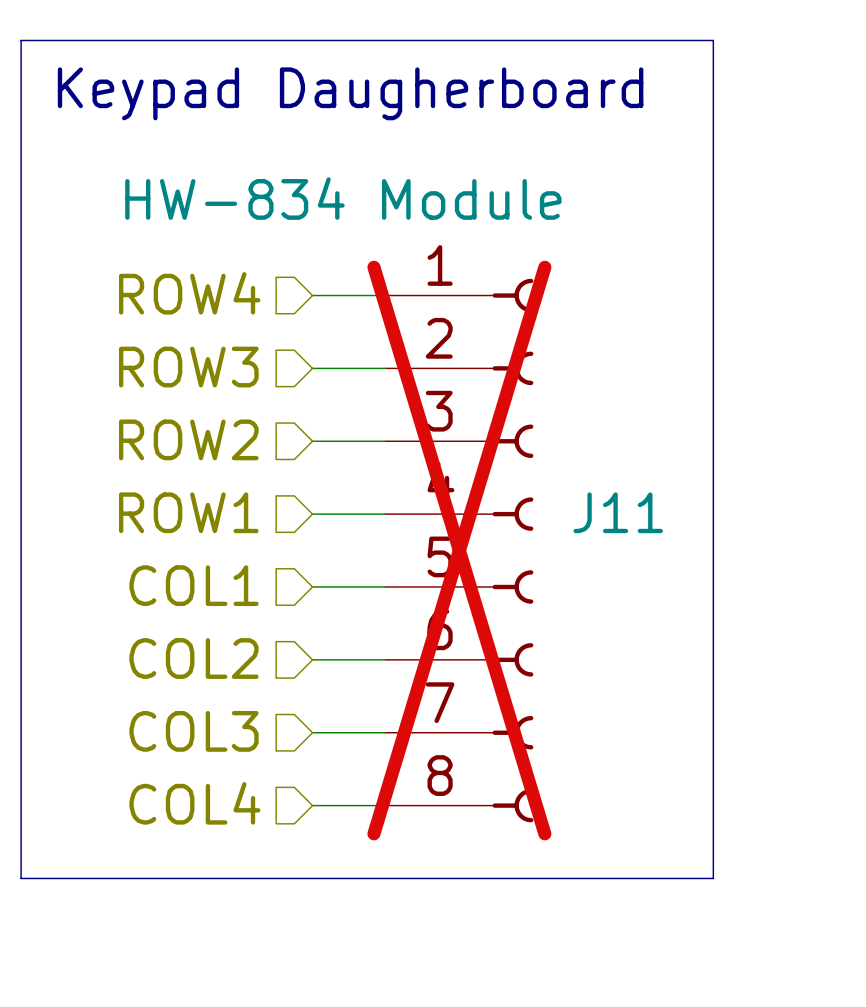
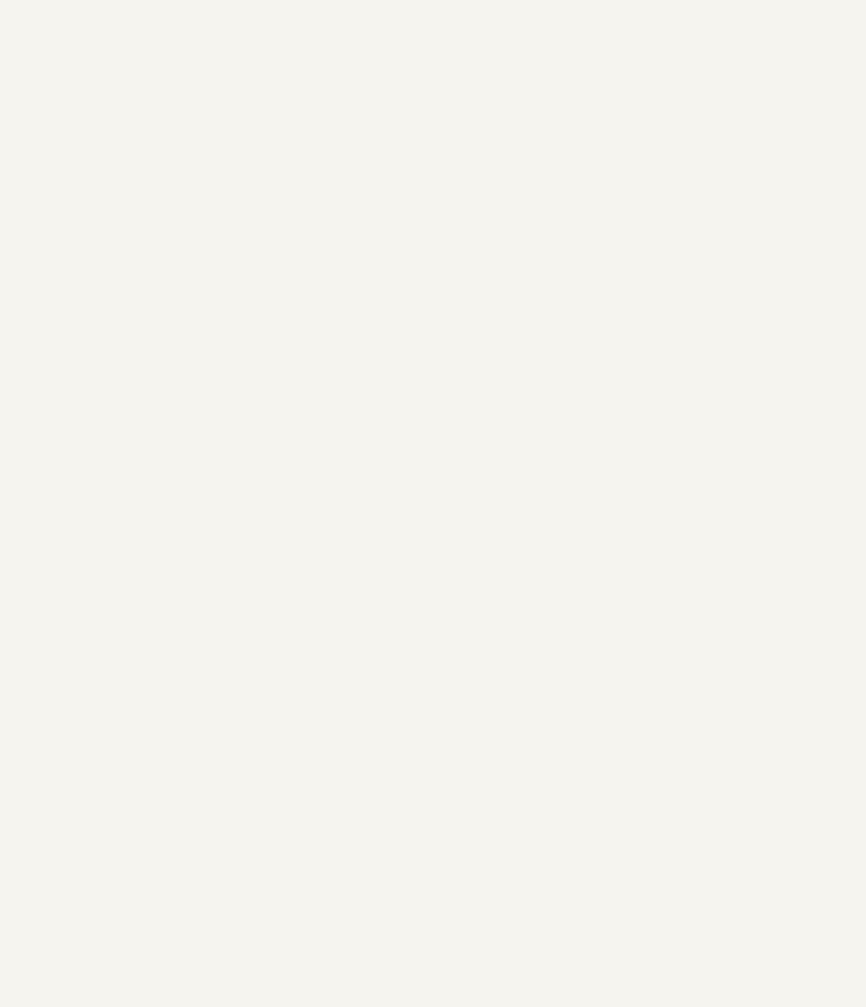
line: (21, 40) (713, 40) (713, 878) (21, 878) (21, 40) -> none
text: Keypad Daugherboard (350, 93) -> none
hierarchical label: ROW4 (189, 293) -> none
wire: (312, 295) (385, 295) -> none
hierarchical label: ROW3 (188, 367) -> none
wire: (312, 368) (385, 368) -> none
hierarchical label: ROW2 (188, 439) -> none
wire: (312, 441) (385, 441) -> none
hierarchical label: ROW1 (188, 512) -> none
wire: (312, 514) (385, 514) -> none
J11: HW-834 Module (459, 550) -> none
hierarchical label: COL1 (194, 585) -> none
wire: (312, 587) (385, 587) -> none
hierarchical label: COL2 (194, 658) -> none
wire: (312, 659) (385, 659) -> none
hierarchical label: COL3 (194, 731) -> none
wire: (312, 732) (385, 732) -> none
hierarchical label: COL4 (194, 803) -> none
wire: (312, 805) (385, 805) -> none

